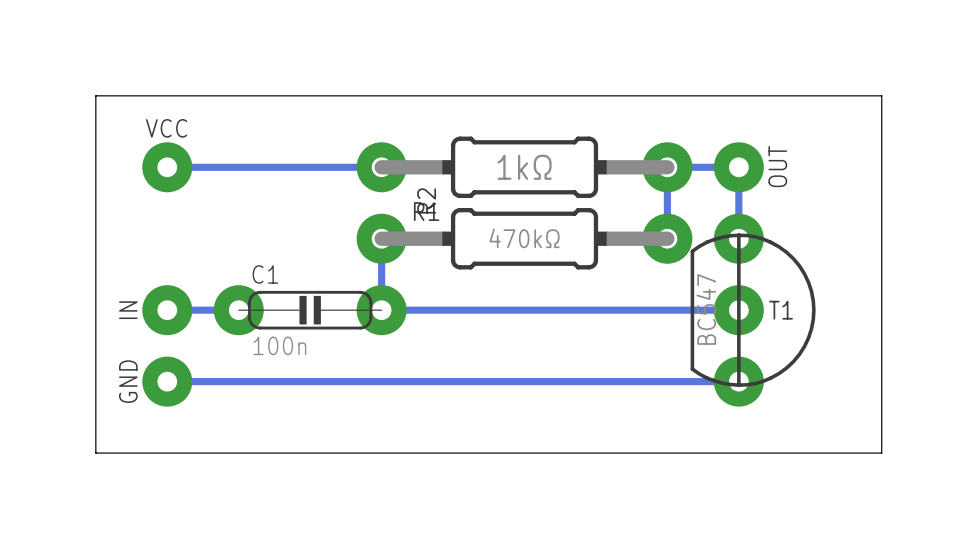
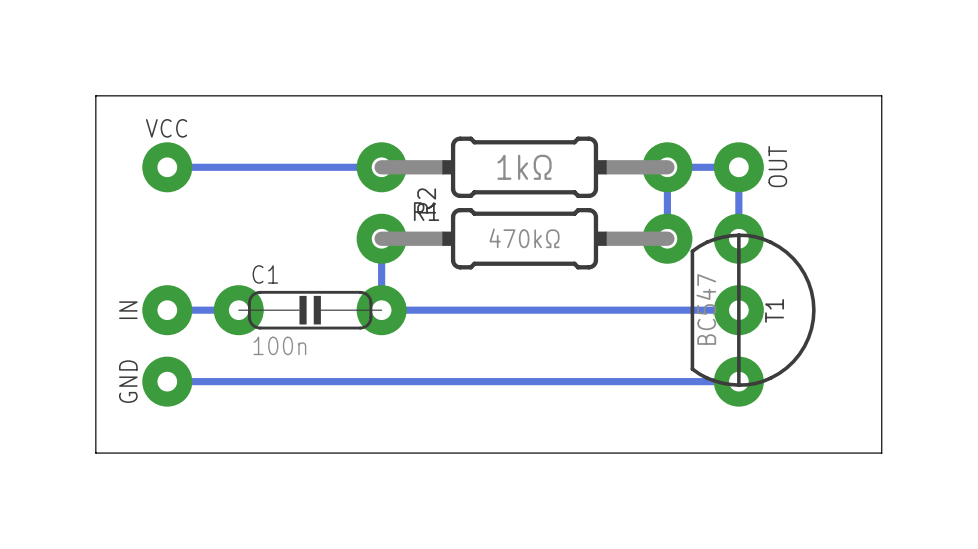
T1 name rotation: 0° (780, 310) -> 90° counterclockwise (774, 310)

